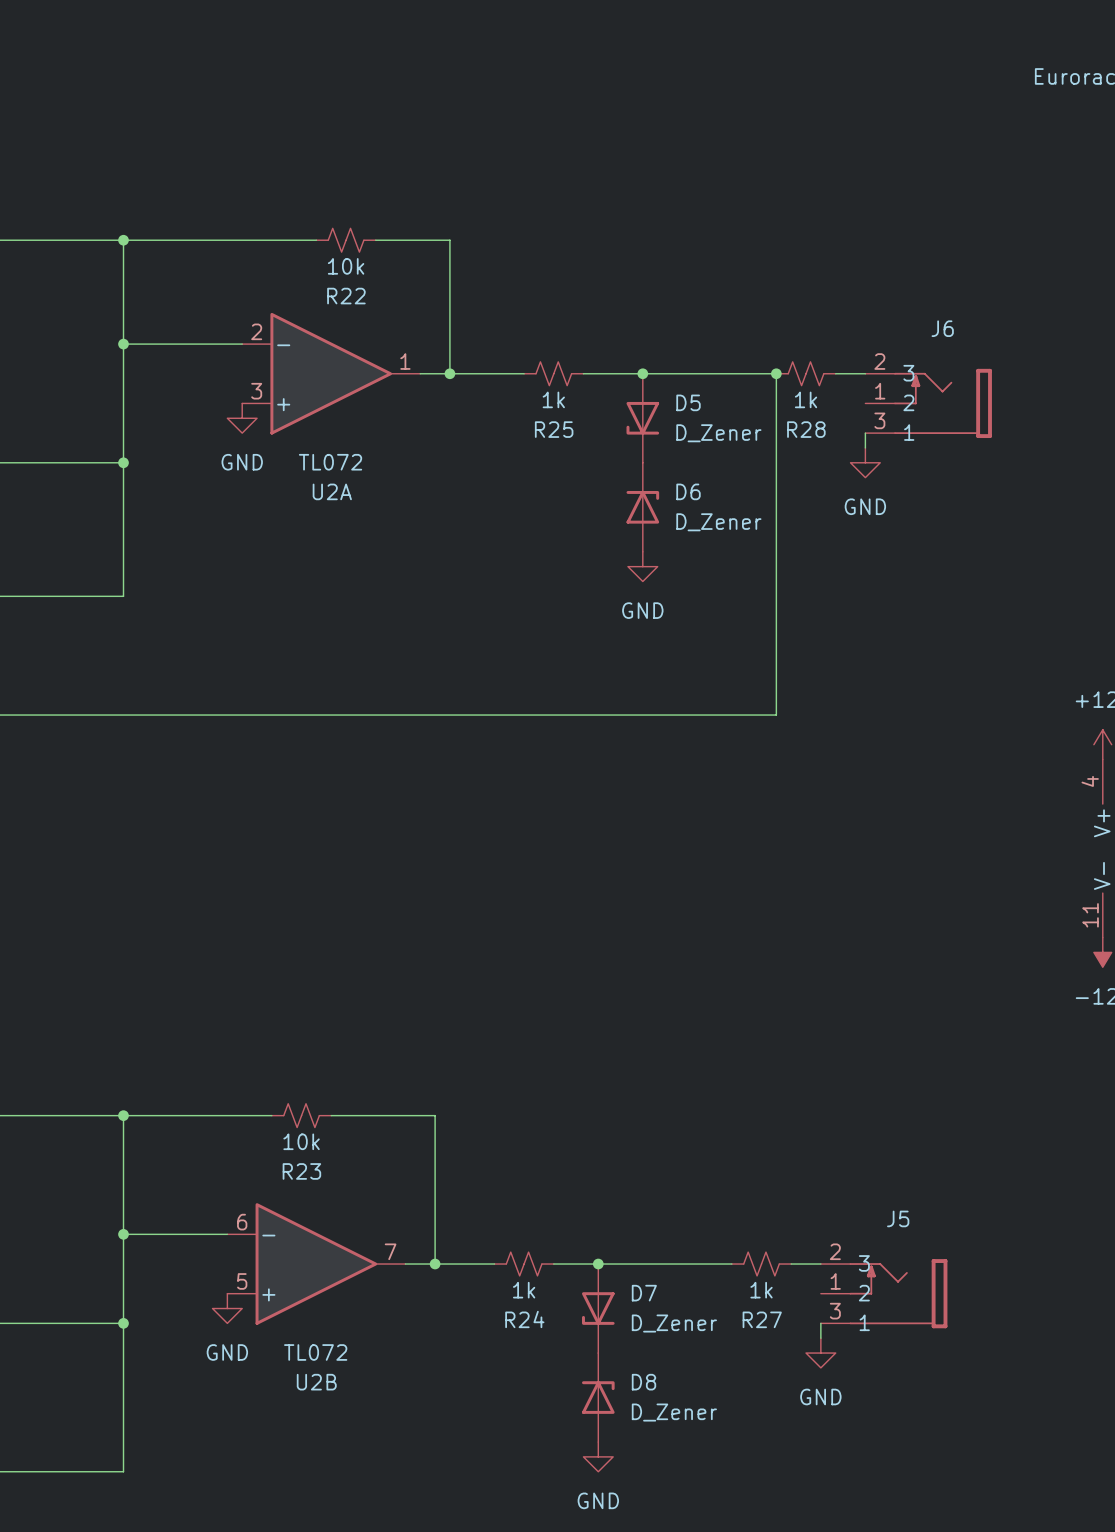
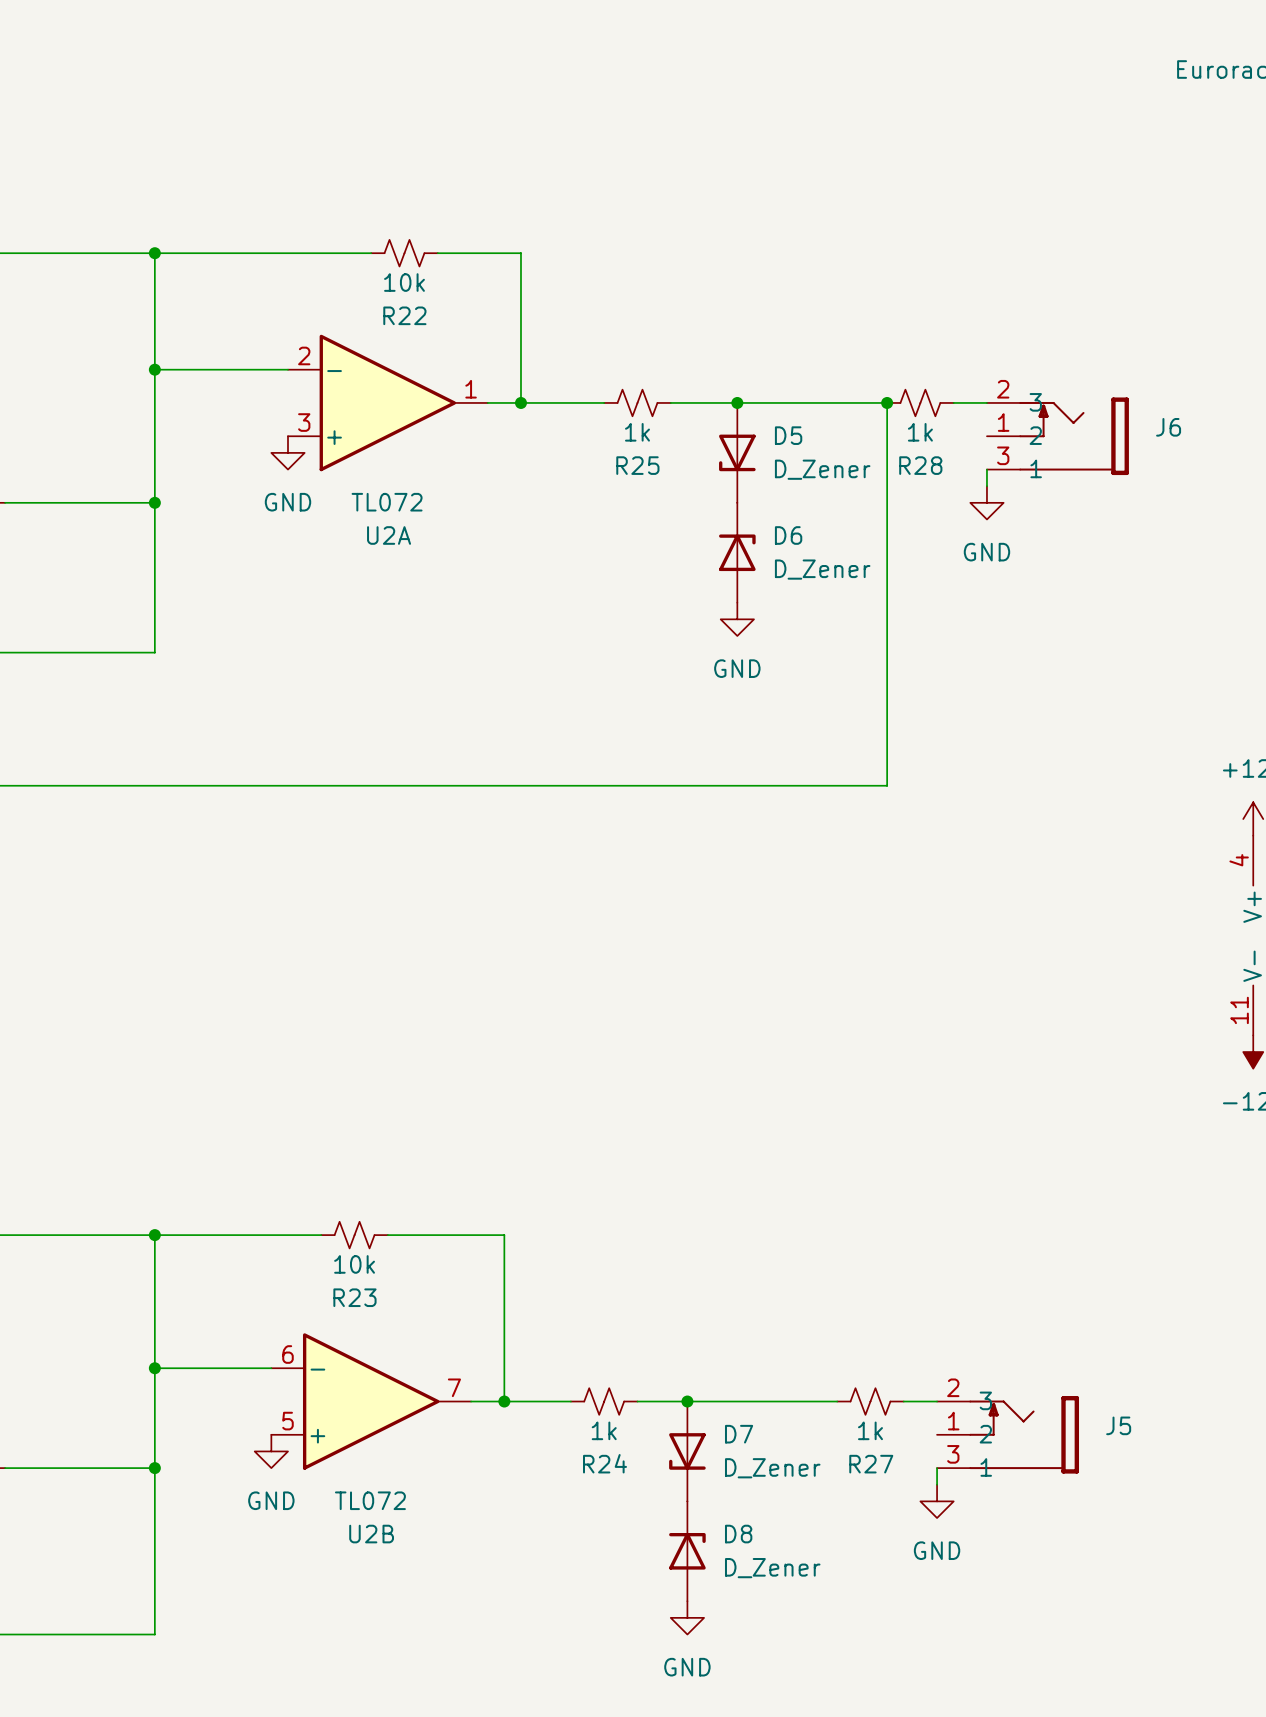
J6 name position: J6 (942, 328) -> J6 (1168, 427)
J5 name position: J5 (898, 1218) -> J5 (1118, 1425)

